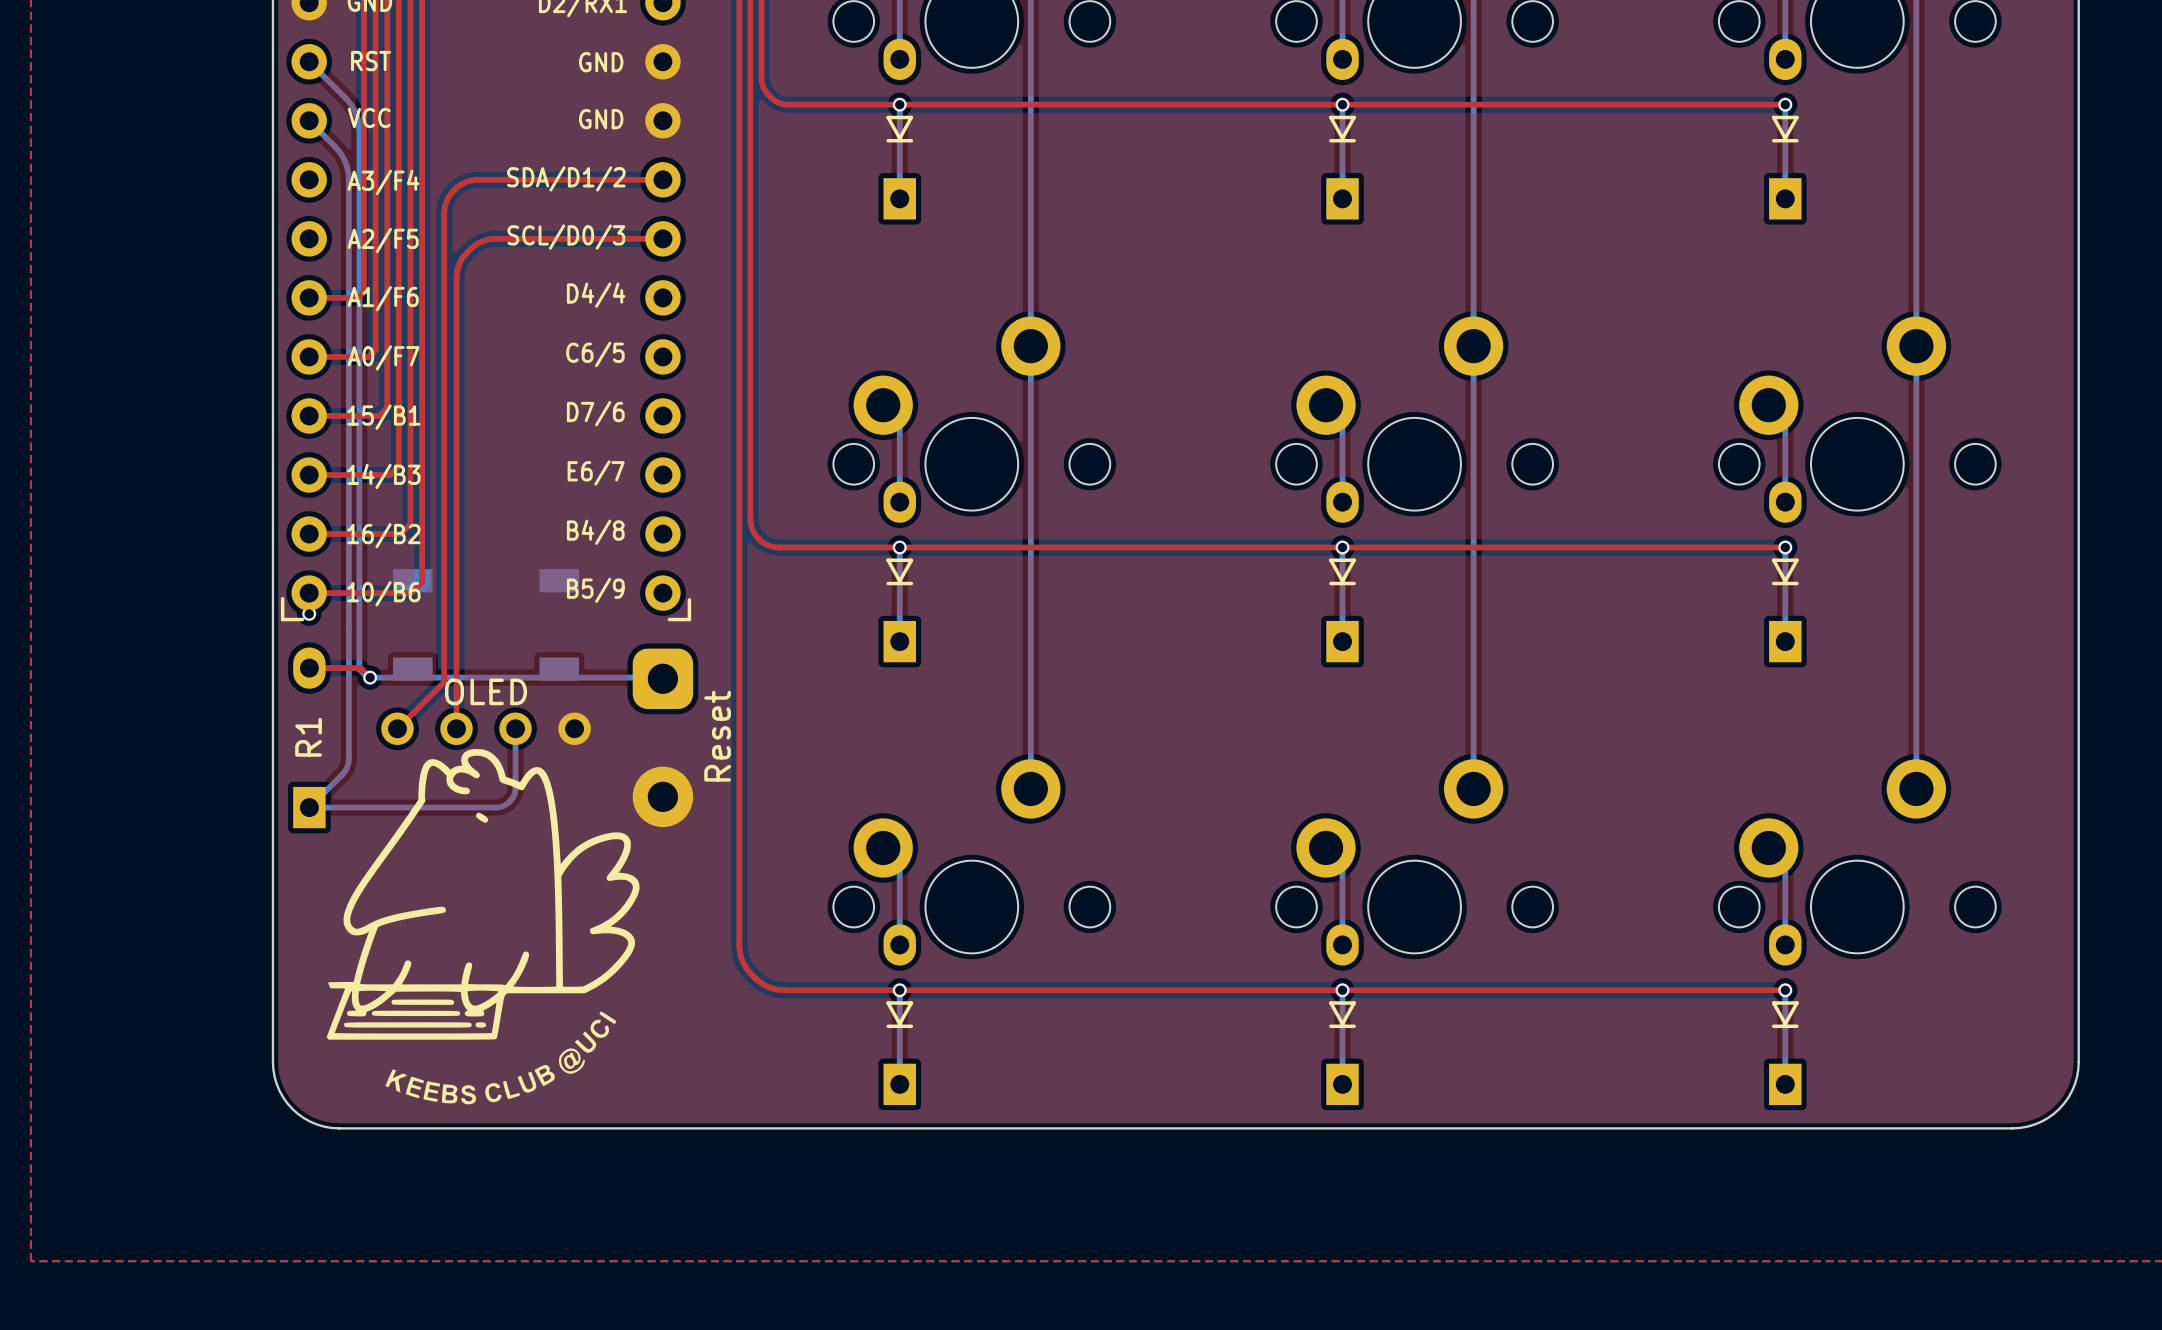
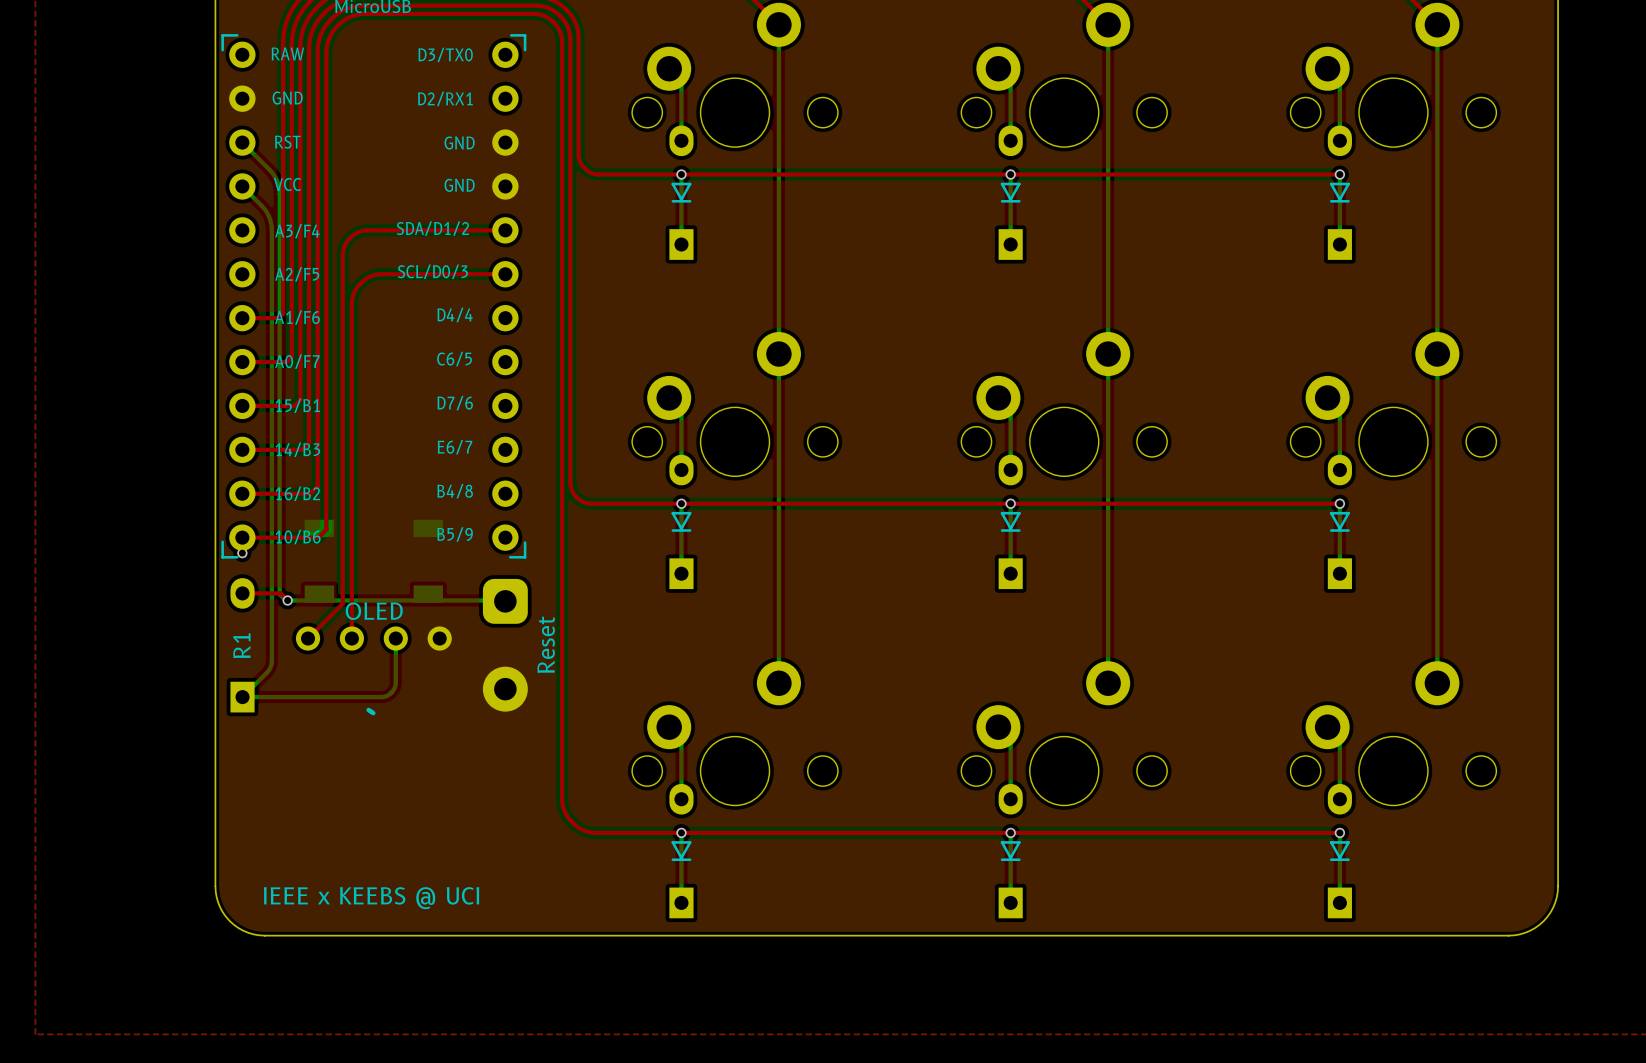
drawing: [326, 748, 640, 1105] -> none
drawing: none -> [366, 707, 376, 716]
text: none -> IEEE x KEEBS @ UCI (371, 898)

